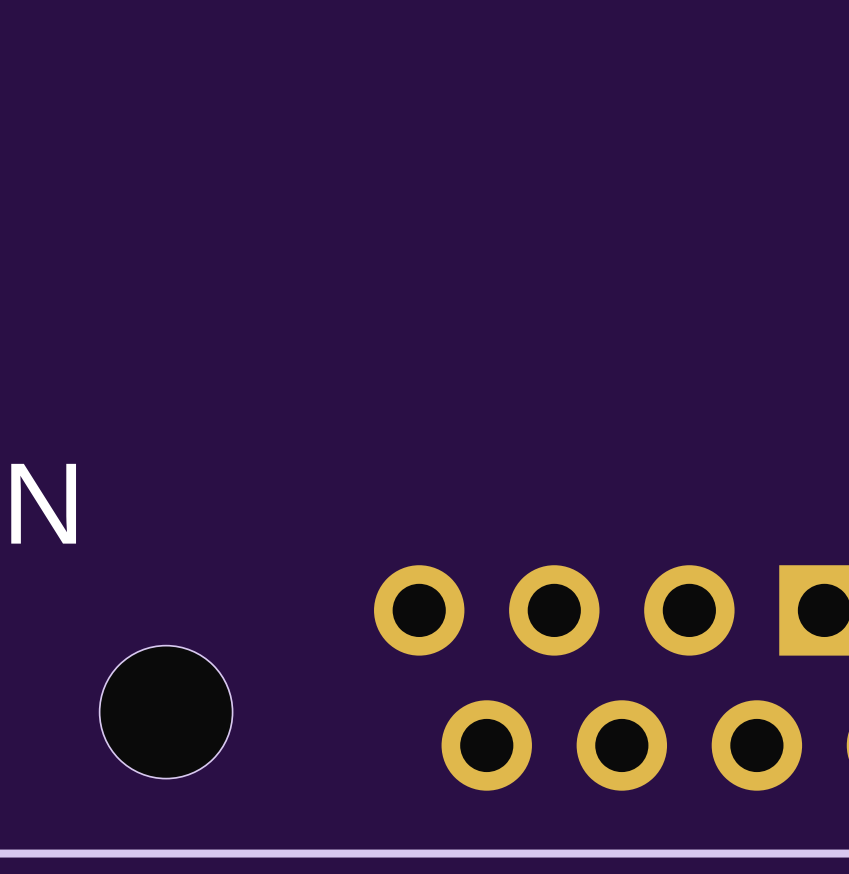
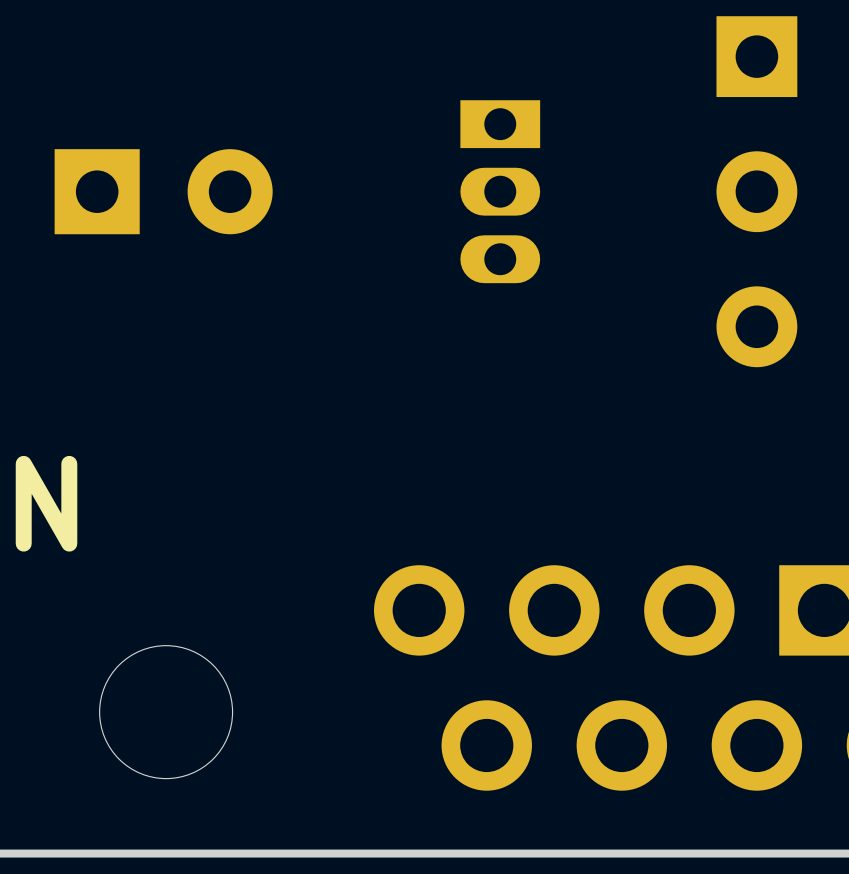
part: none -> (163, 191)
part: none -> (500, 191)
part: none -> (756, 191)

